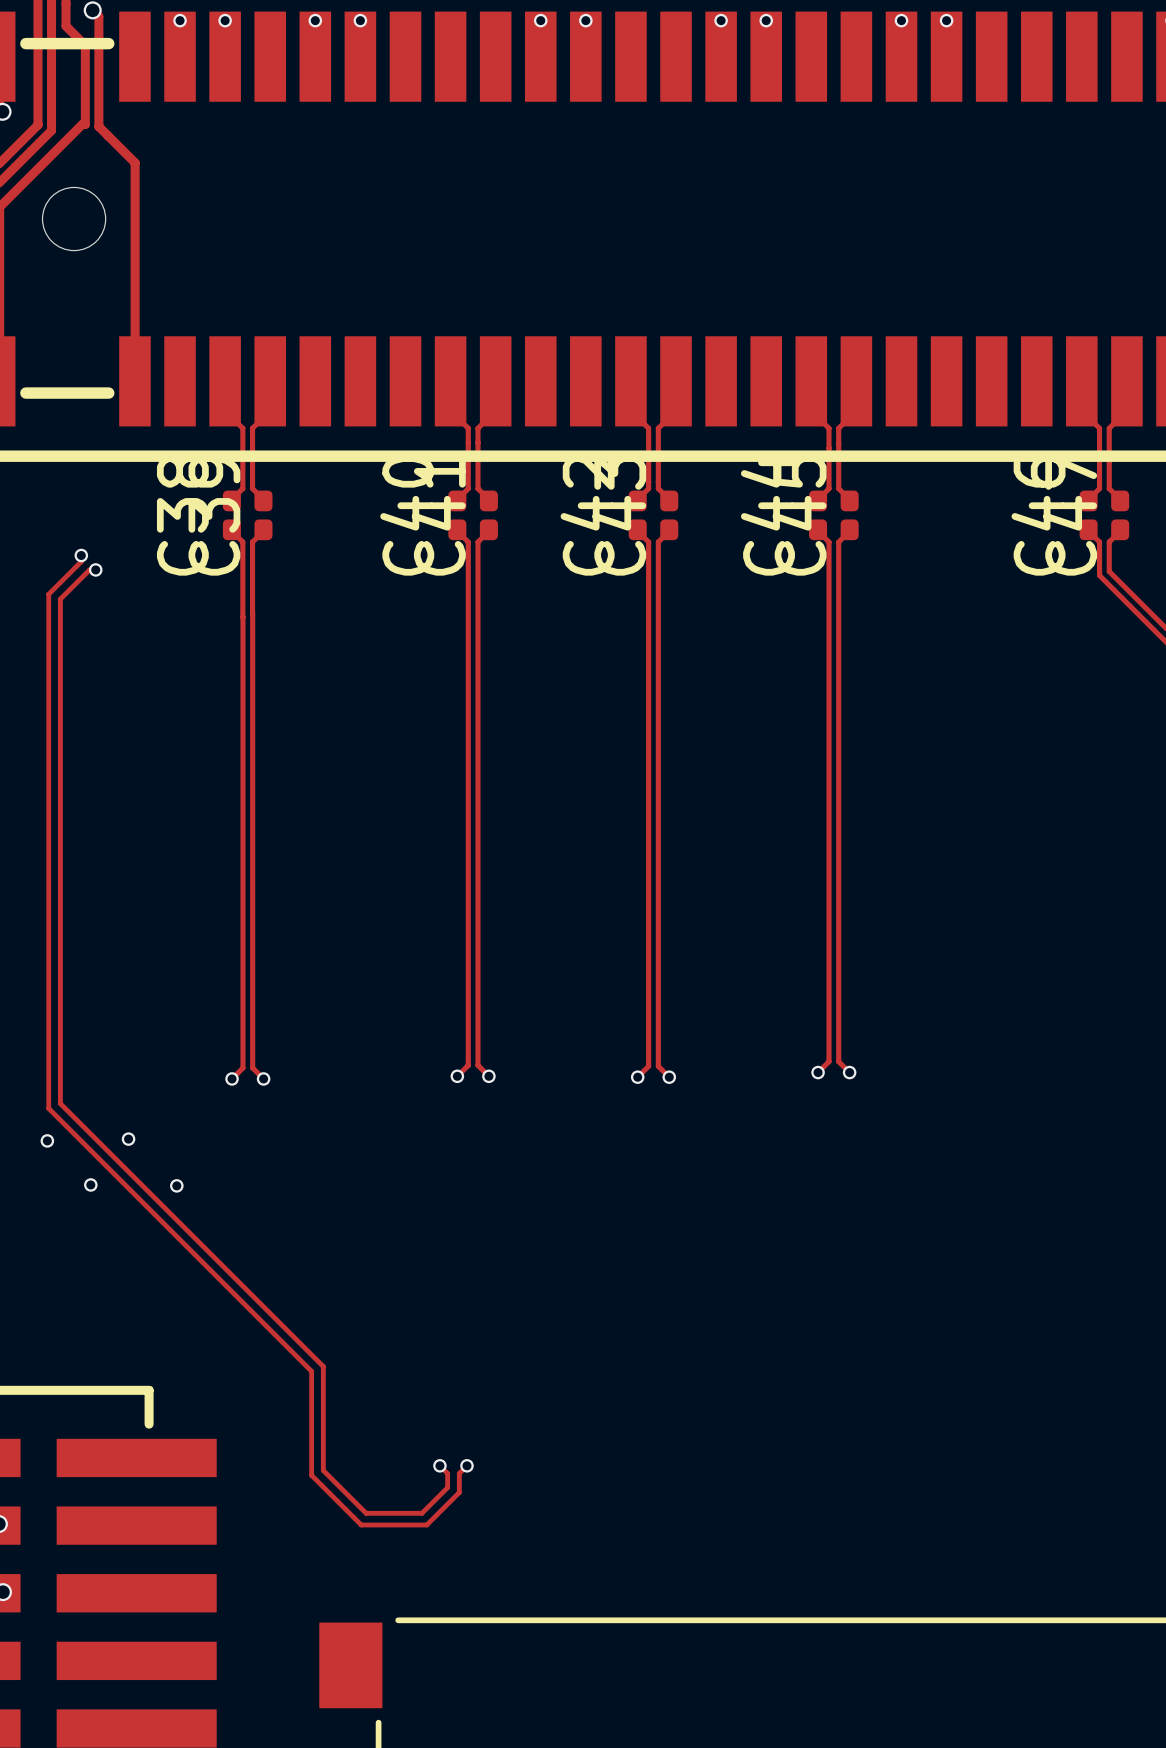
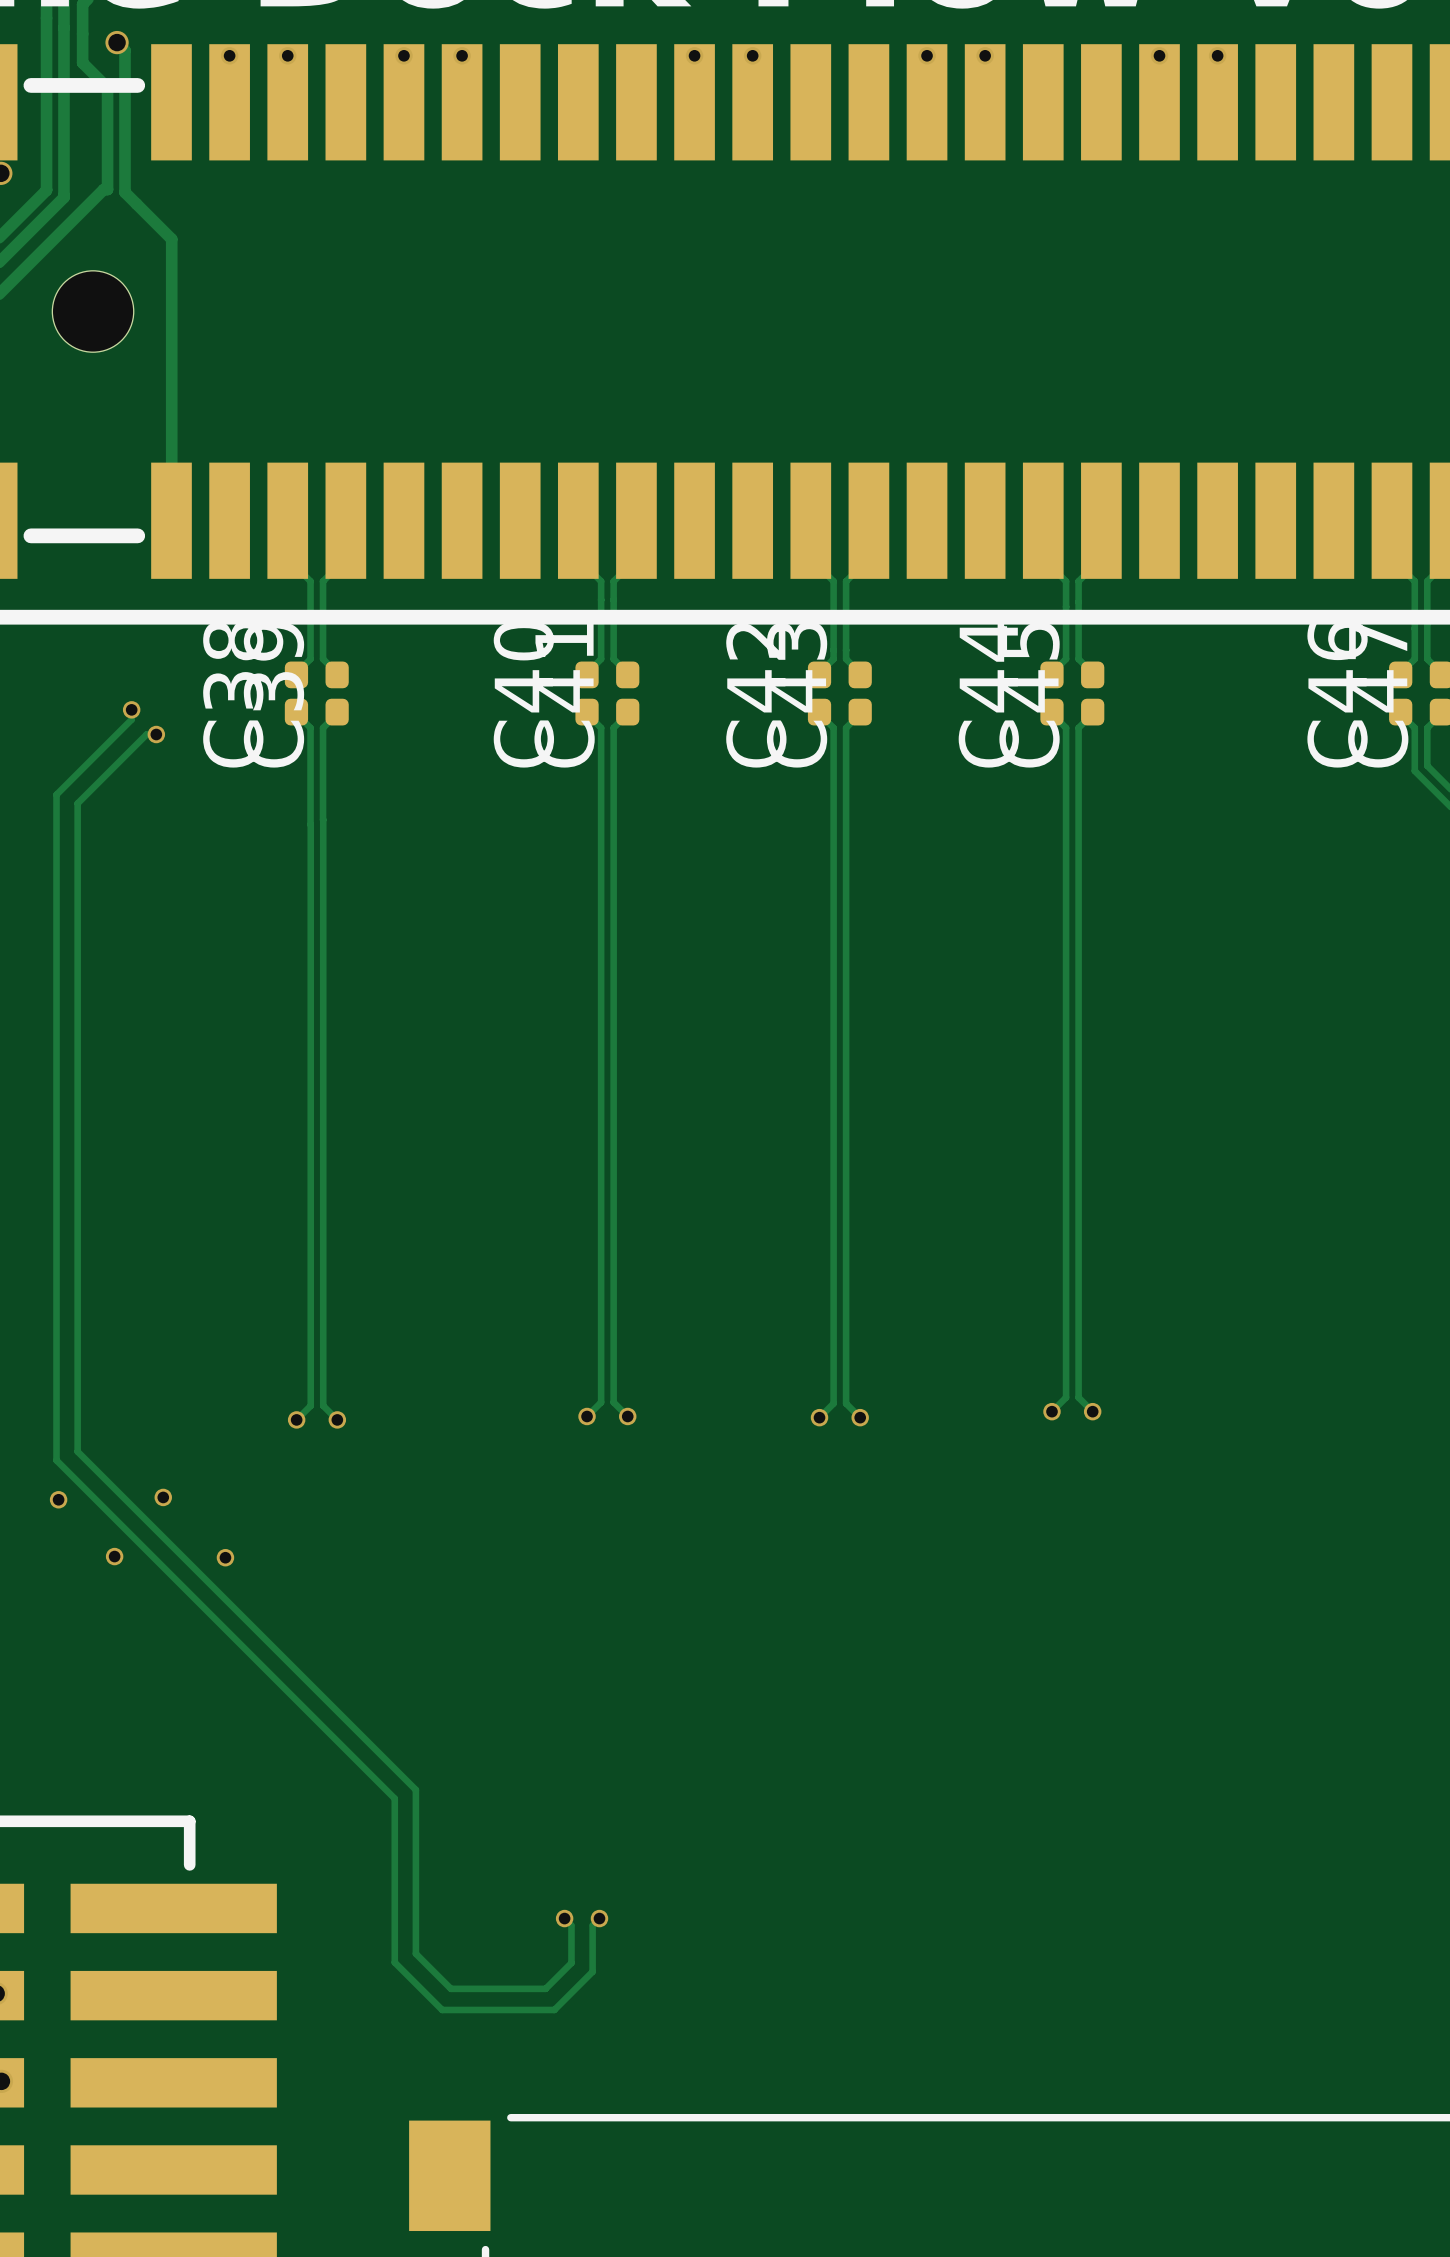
via: none -> (131, 709)
via: none -> (156, 734)
track: (81, 555) (81, 561) (48, 594) (48, 1108) (311, 1371) (311, 1475) (361, 1525) (426, 1525) (459, 1492) (459, 1473) (461, 1471) -> (131, 709) (131, 719) (56, 794) (56, 1460) (394, 1798) (394, 1962) (442, 2009) (554, 2009) (592, 1971) (592, 1925)
via: (81, 555) -> none
track: (95, 569) (89, 569) (60, 599) (60, 1103) (323, 1366) (323, 1470) (366, 1513) (421, 1513) (447, 1487) (447, 1473) (445, 1471) -> (156, 734) (146, 734) (77, 803) (77, 1451) (415, 1789) (415, 1953) (450, 1988) (545, 1988) (571, 1963) (571, 1925)
via: (95, 569) -> none

